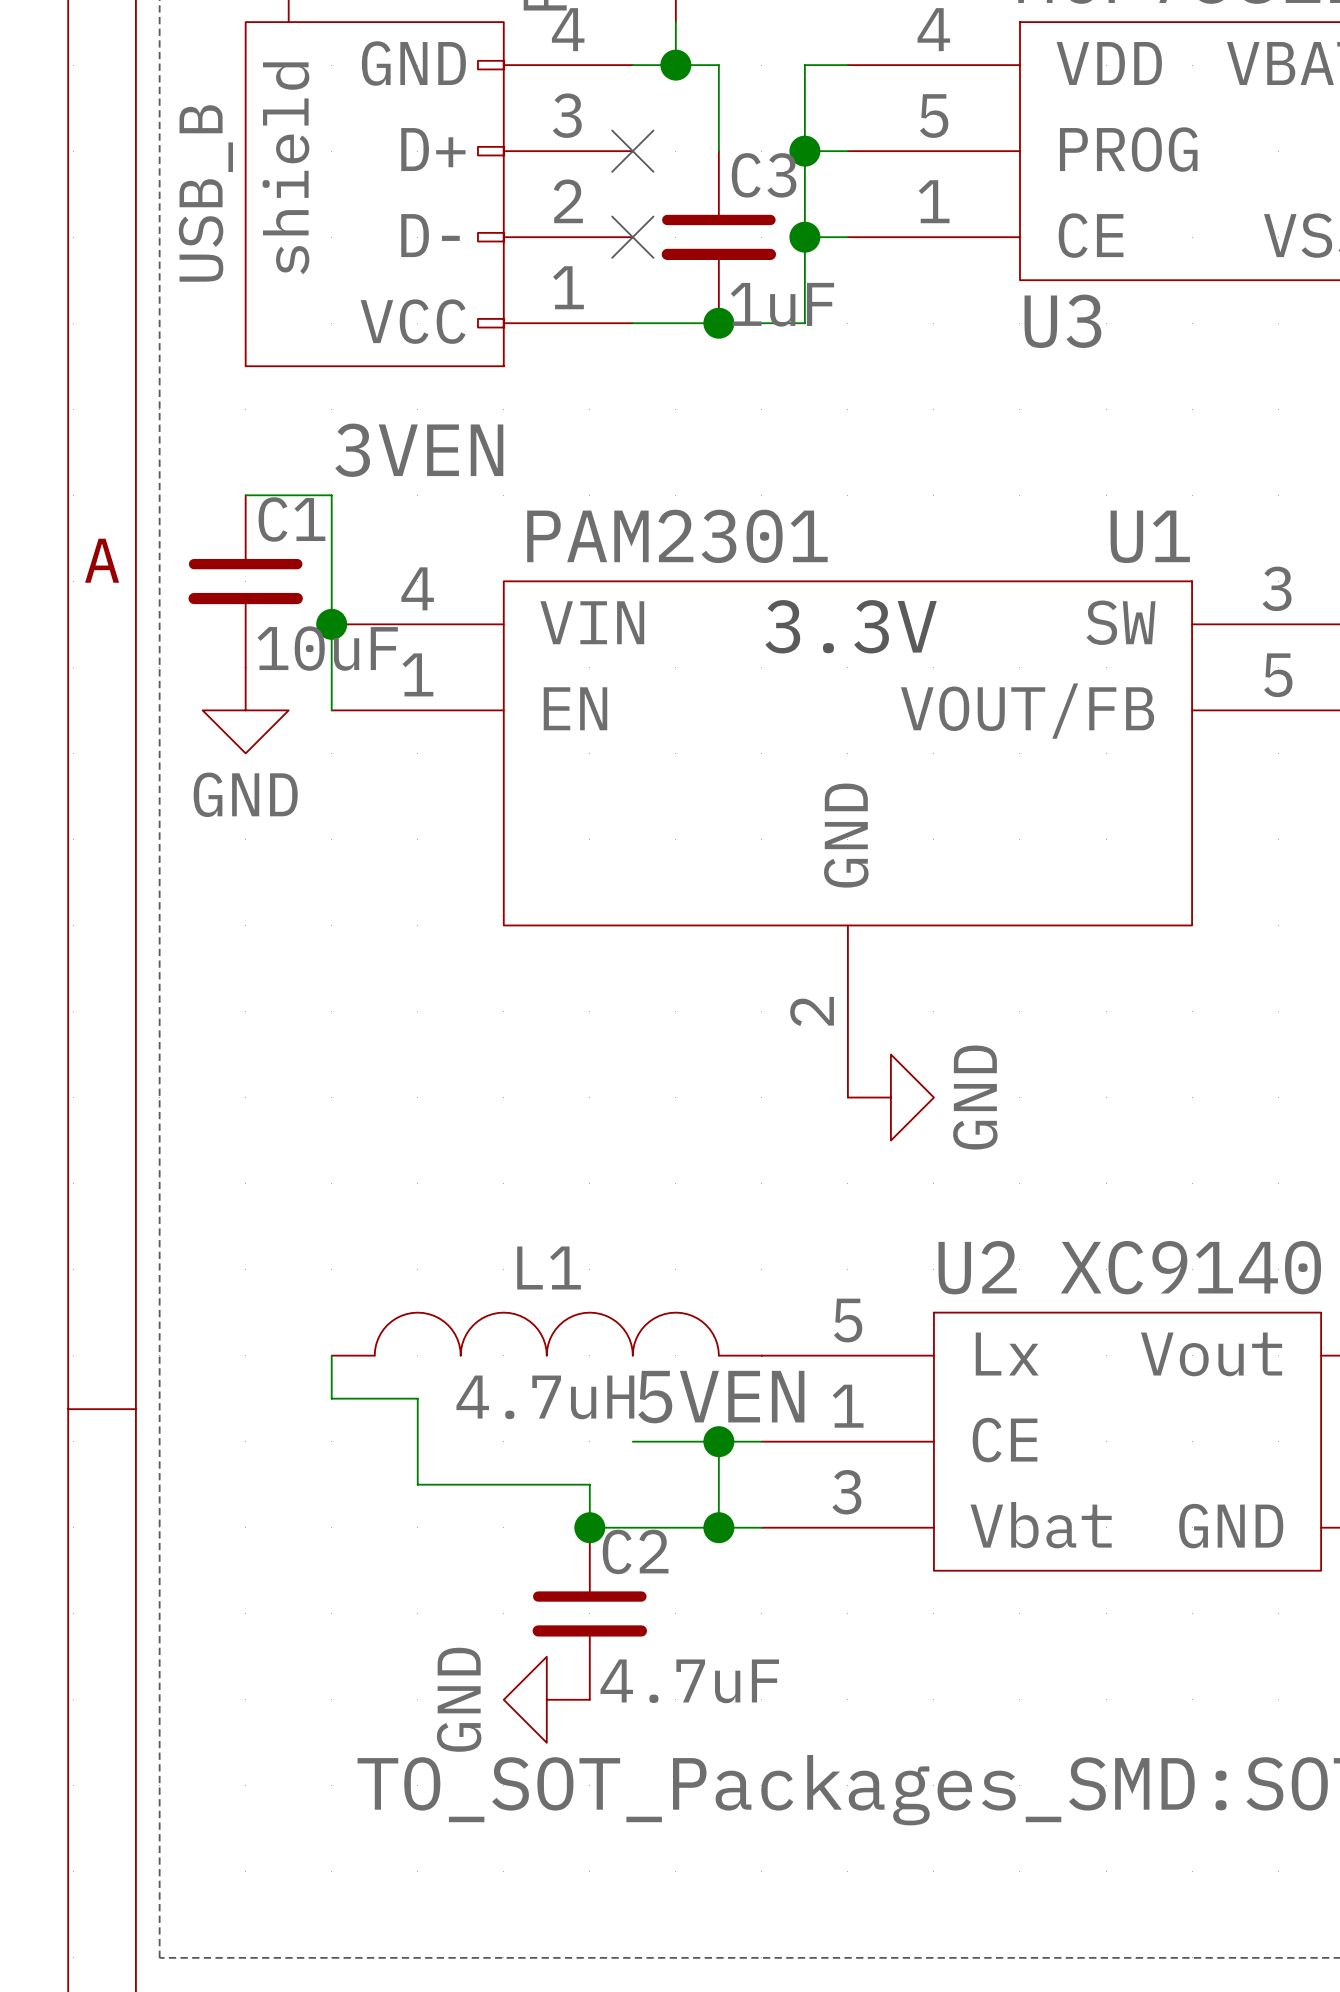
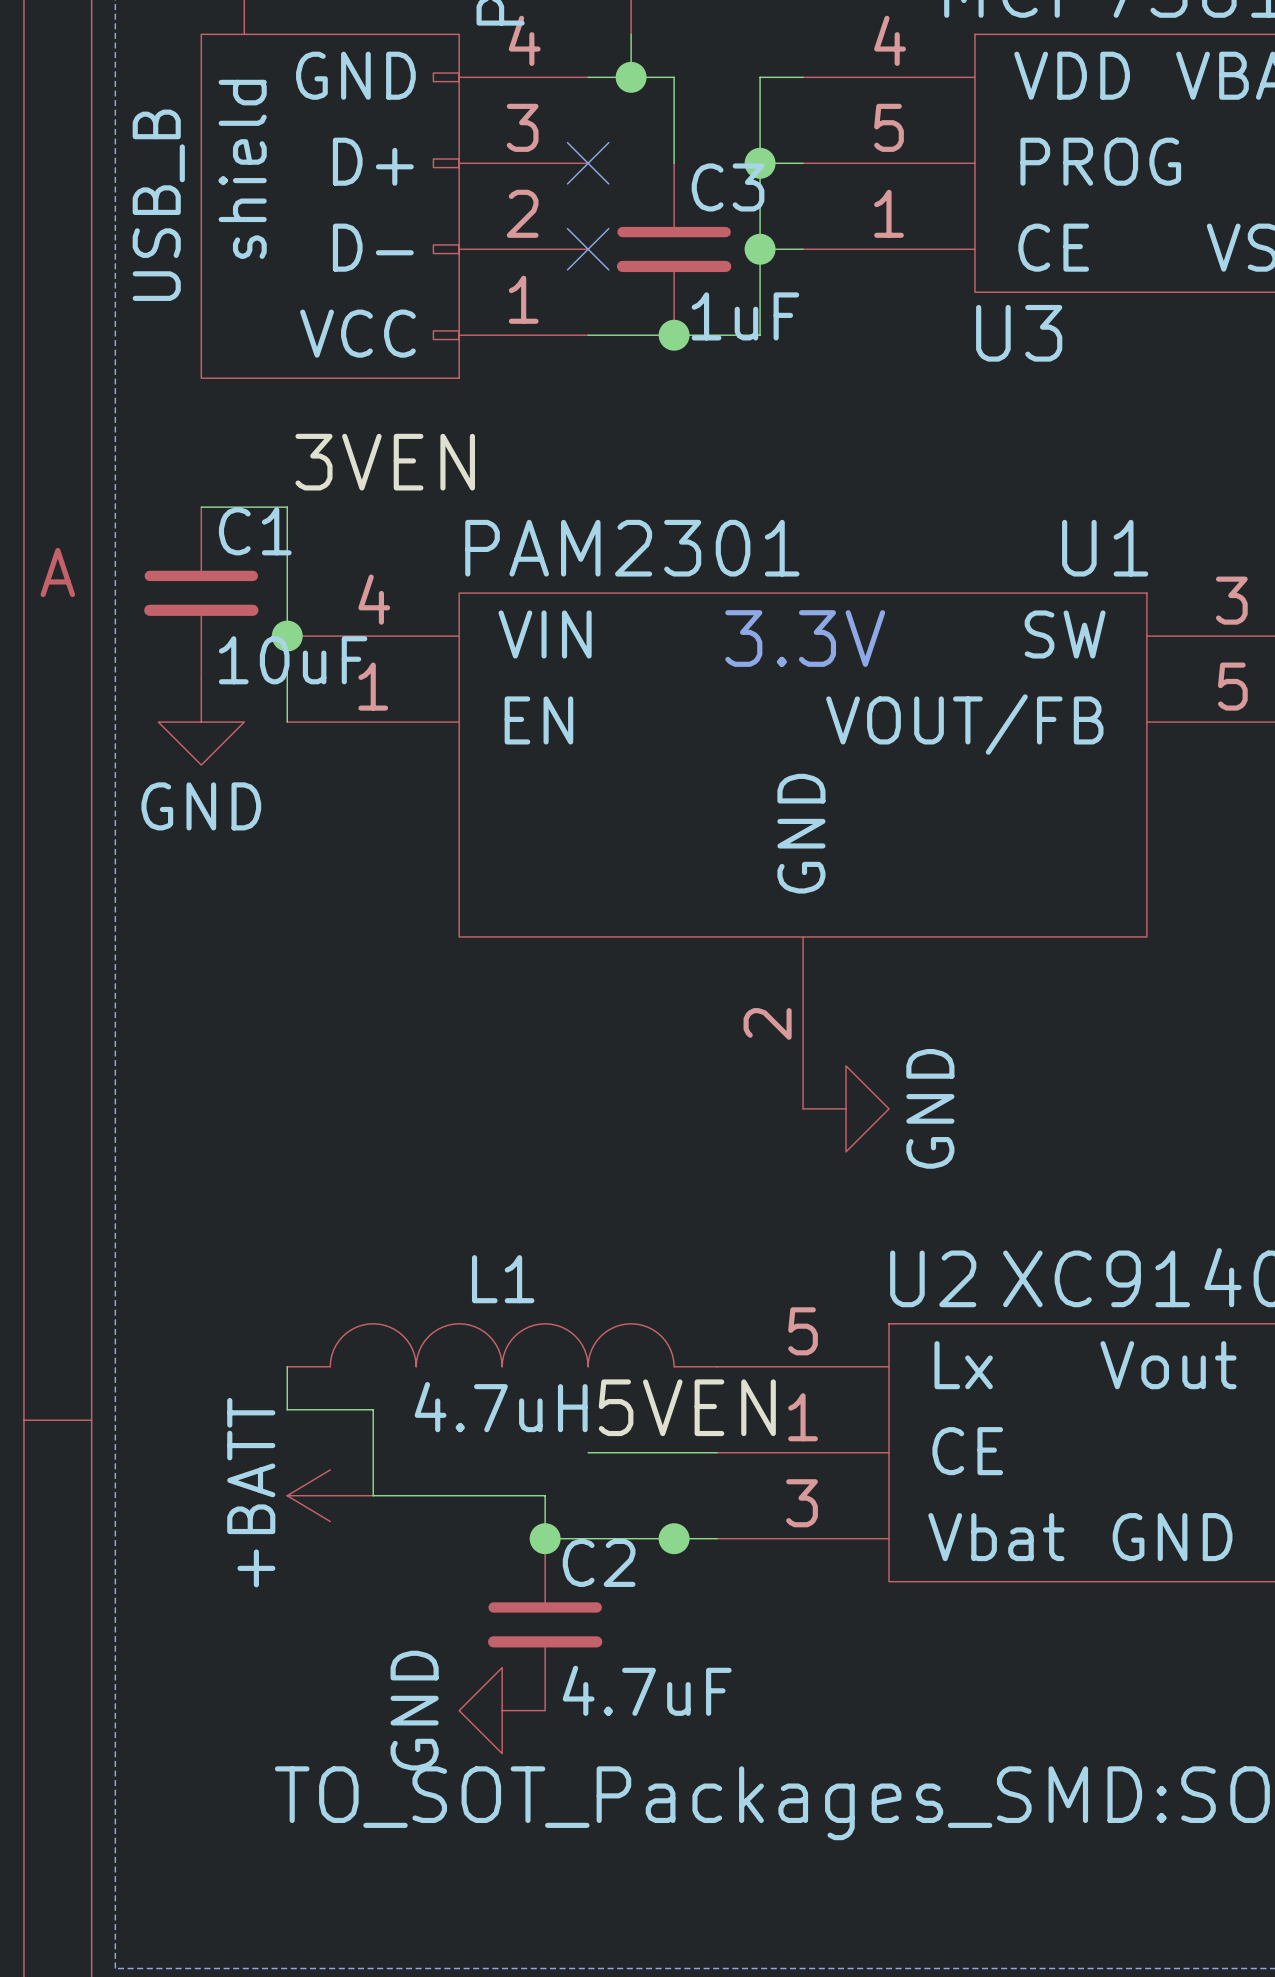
wire: (718, 1441) (718, 1527) -> none
junction: (718, 1441) -> none
power symbol: none -> +BATT (330, 1495)

